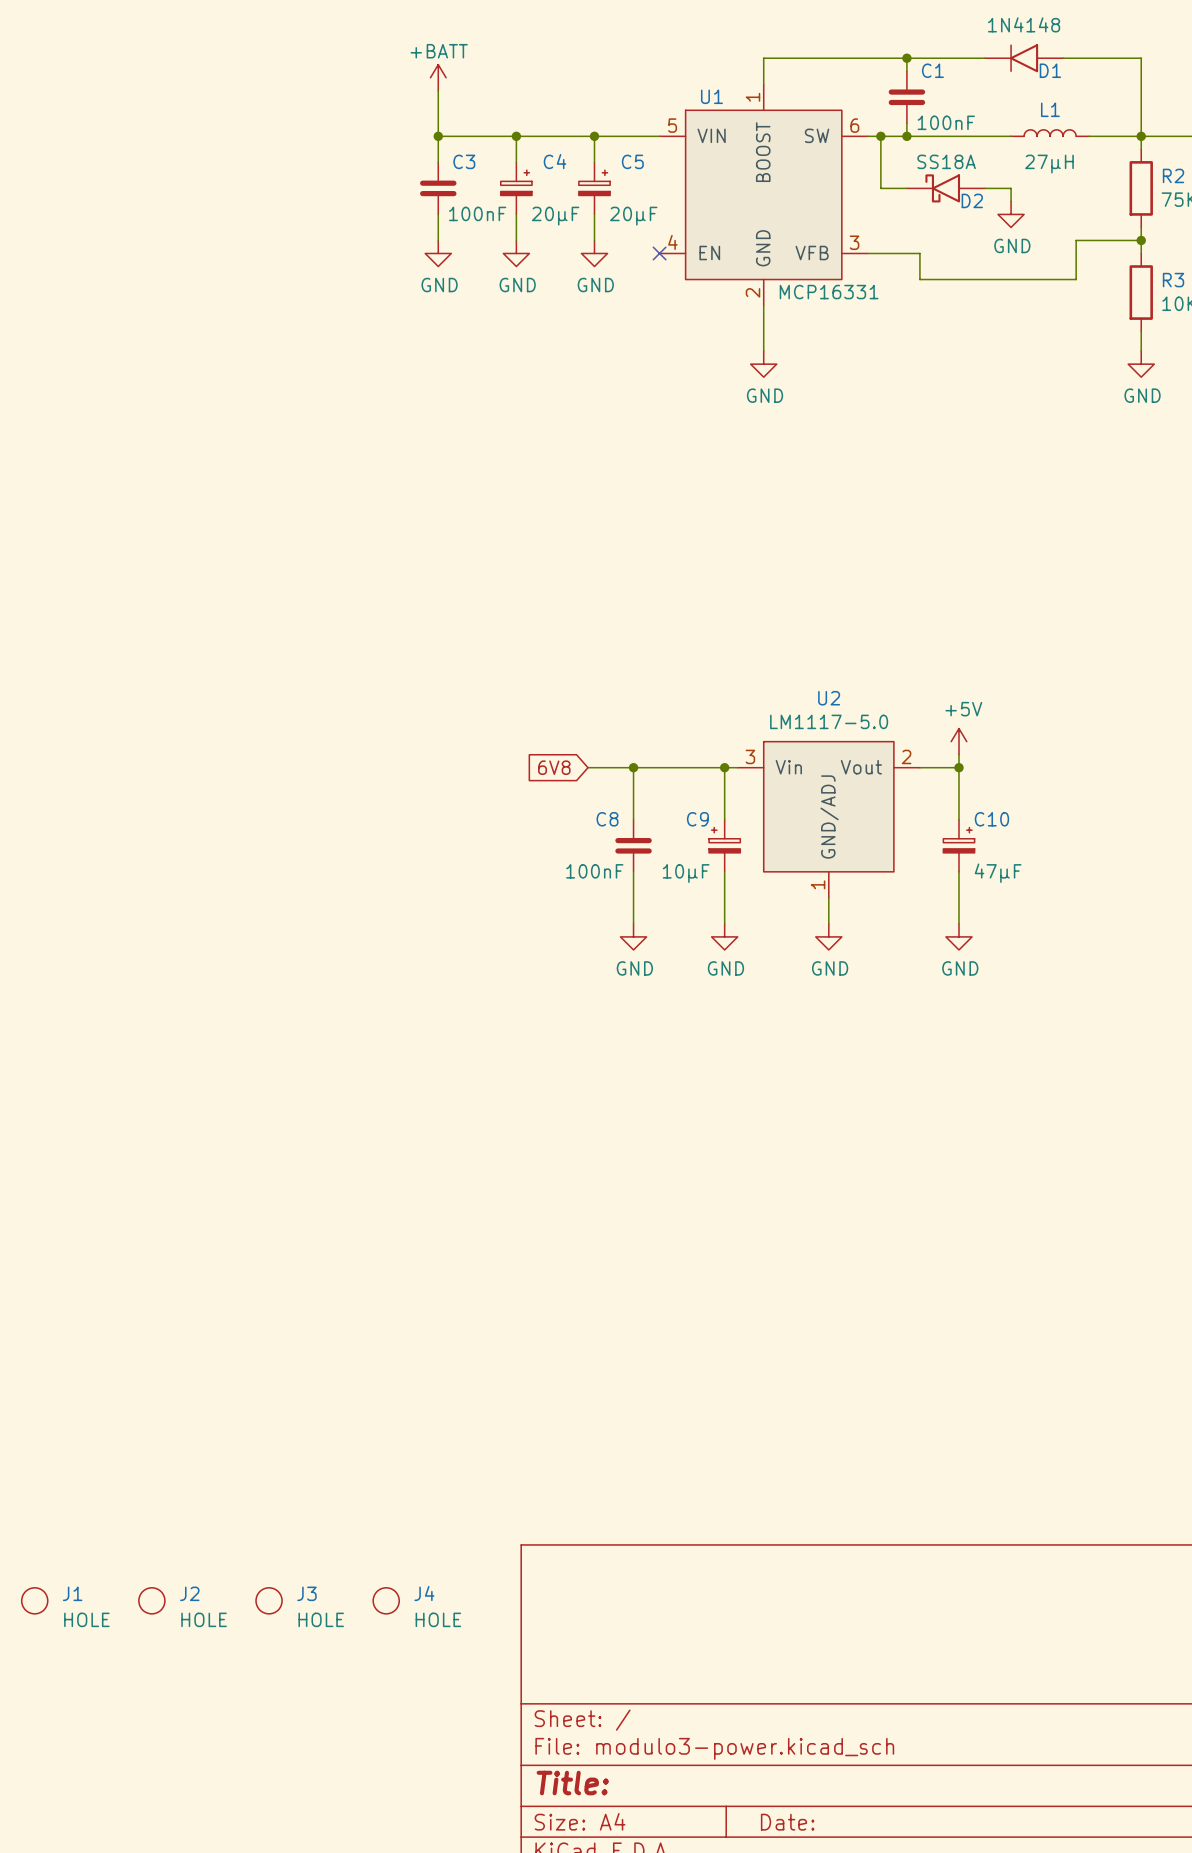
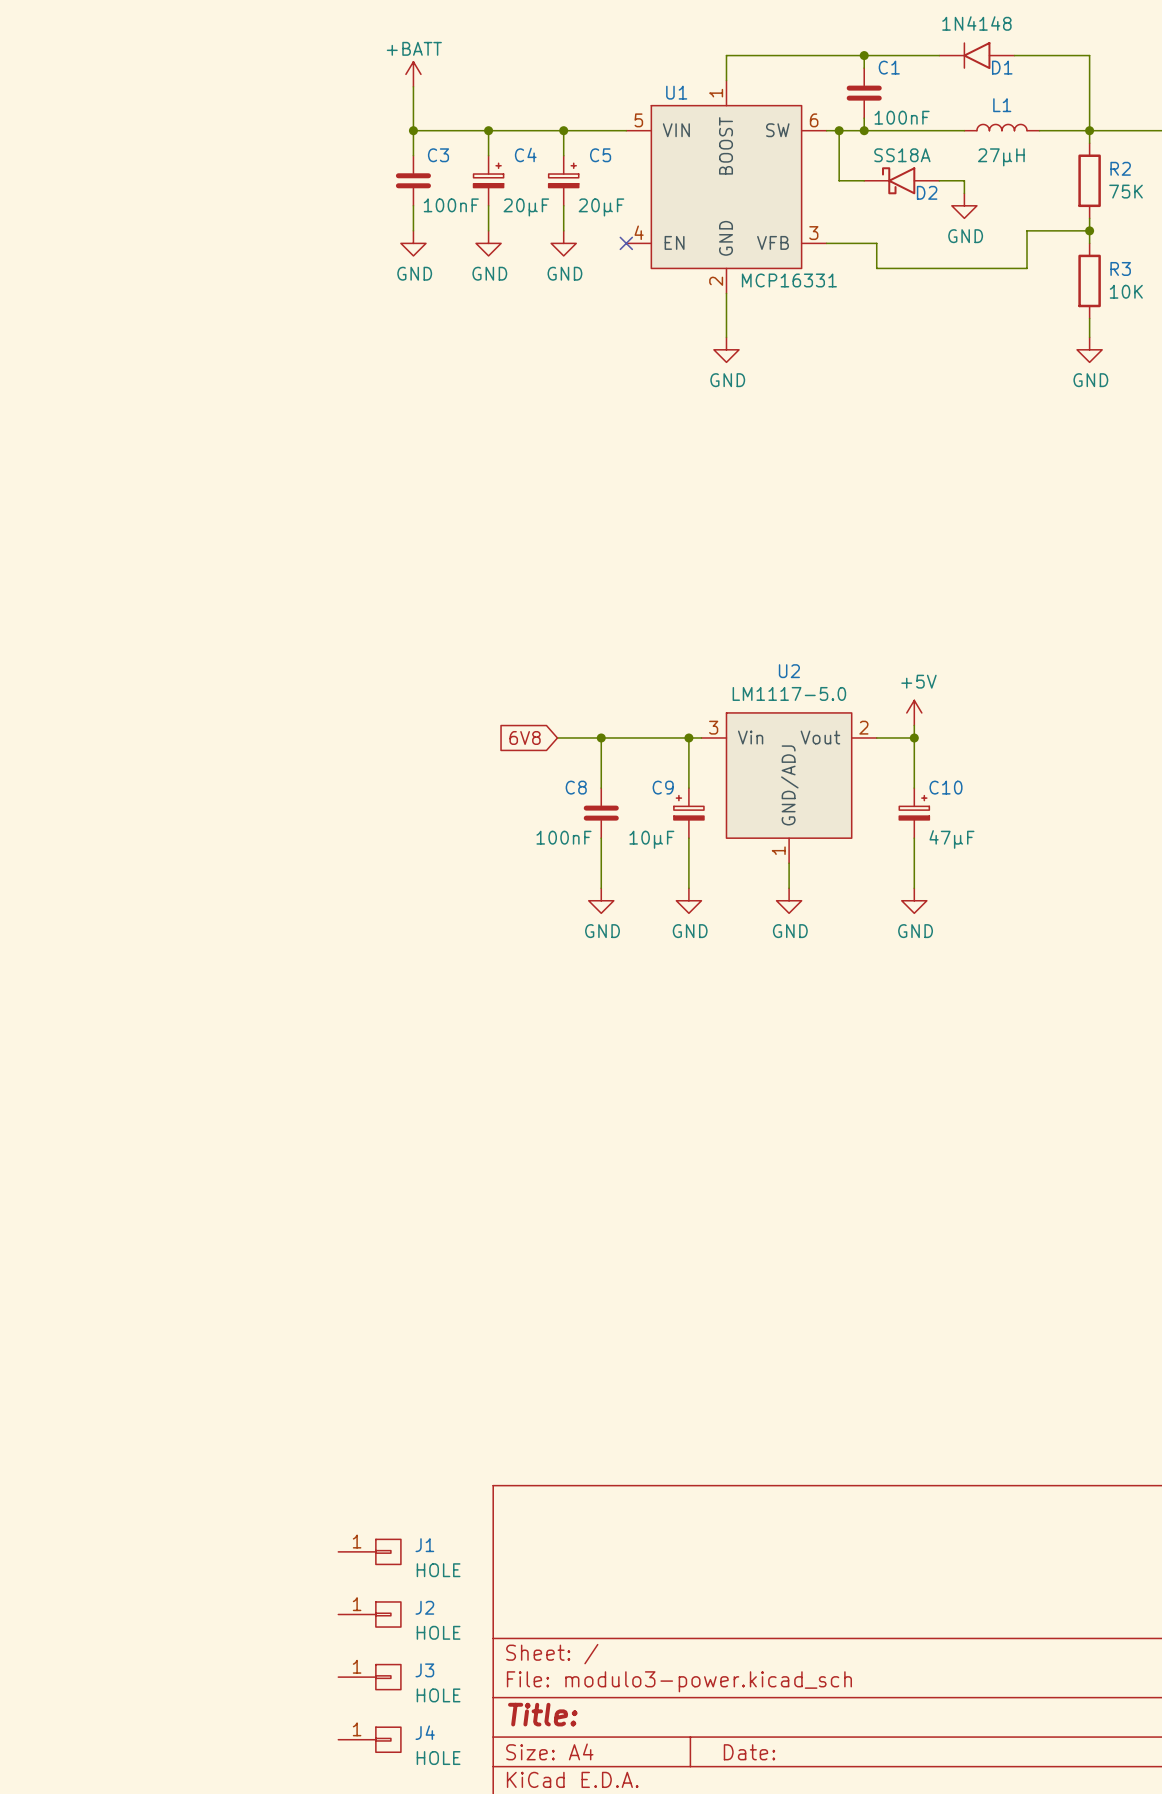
J1 symbol: [21, 1587, 48, 1614] -> [338, 1539, 401, 1565]
J2 symbol: [138, 1587, 165, 1614] -> [338, 1601, 401, 1628]
J3 symbol: [256, 1587, 283, 1614] -> [338, 1664, 401, 1690]
J4 symbol: [373, 1587, 400, 1614] -> [338, 1727, 401, 1753]

